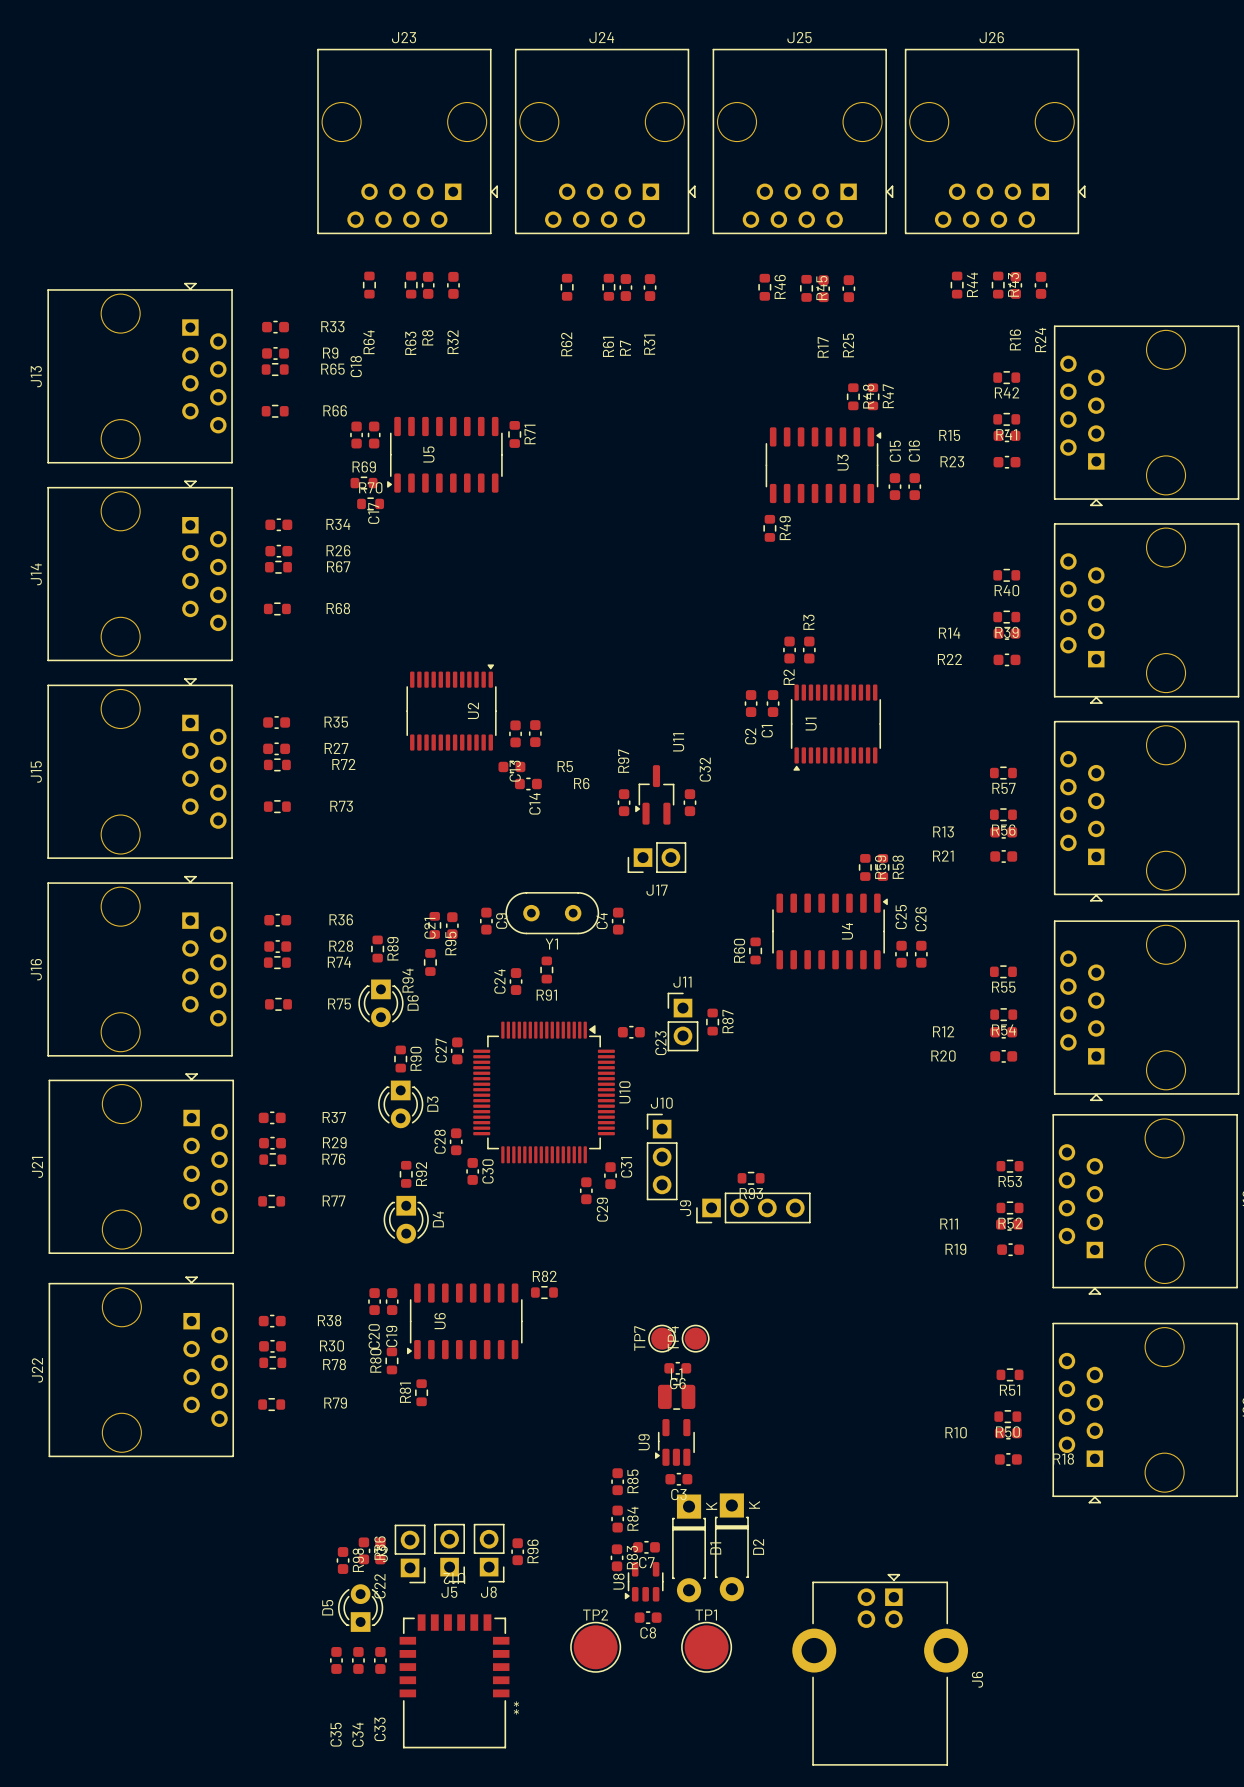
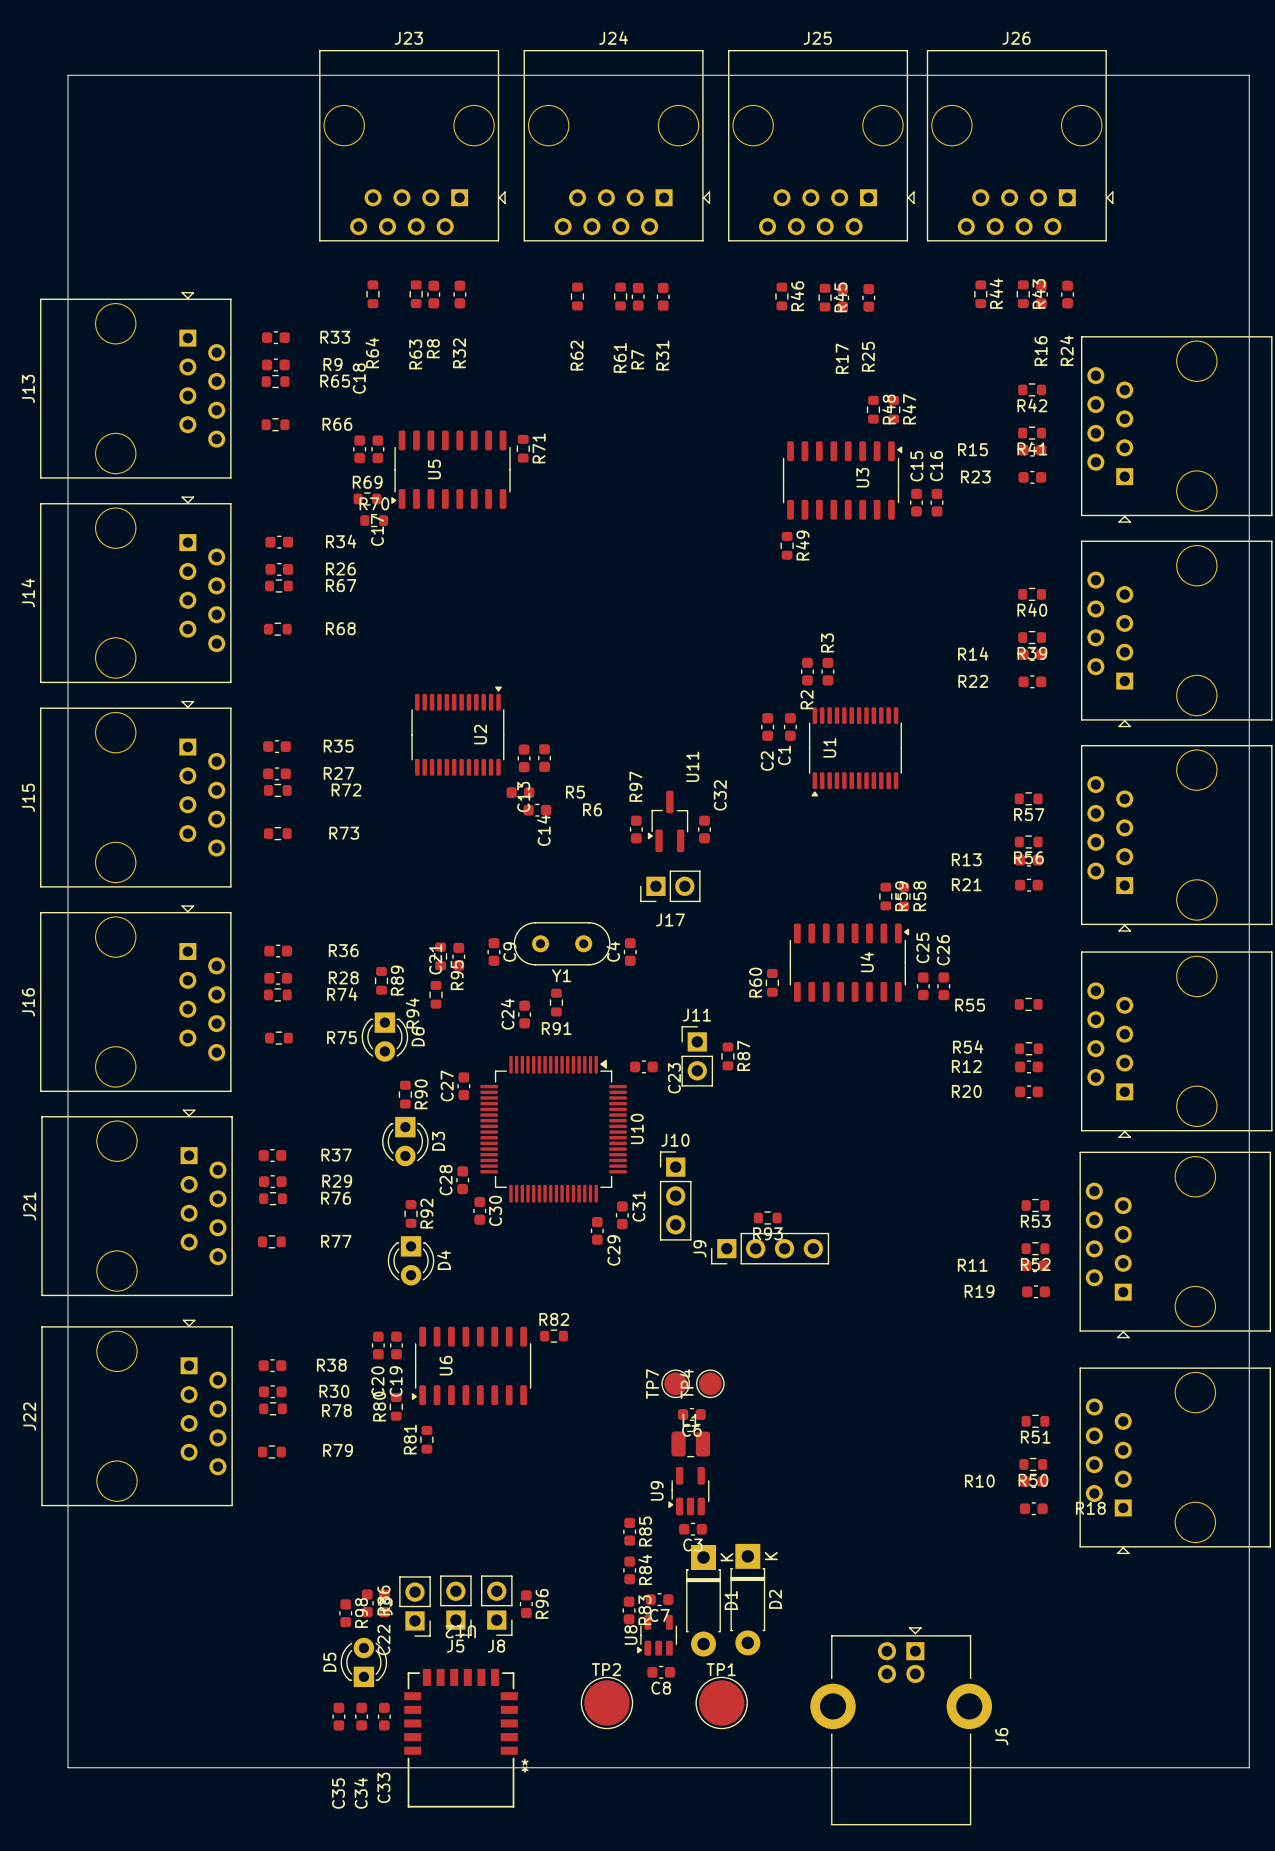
board edge: none -> (68, 75) (1249, 75) (1249, 1767) (68, 1767) (68, 75)
R55 name position: R55 (1003, 987) -> R55 (970, 1005)
R54 name position: R54 (1003, 1030) -> R54 (968, 1046)

